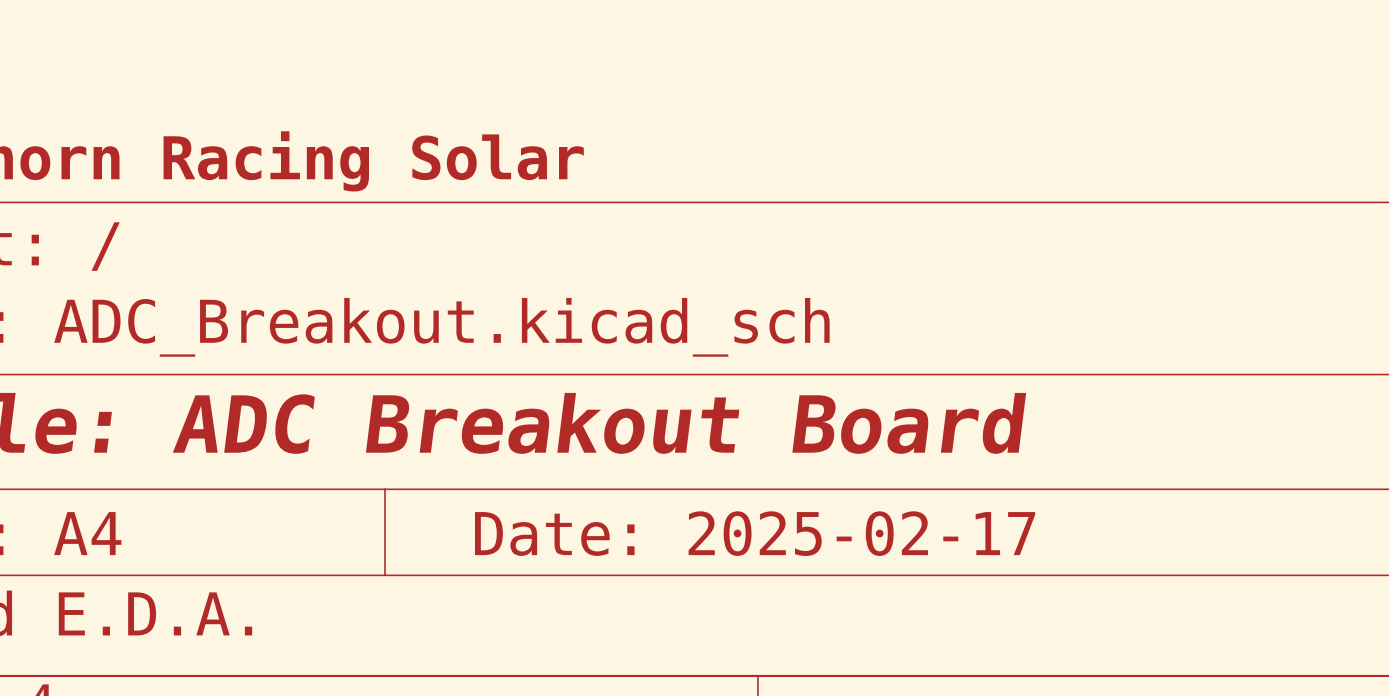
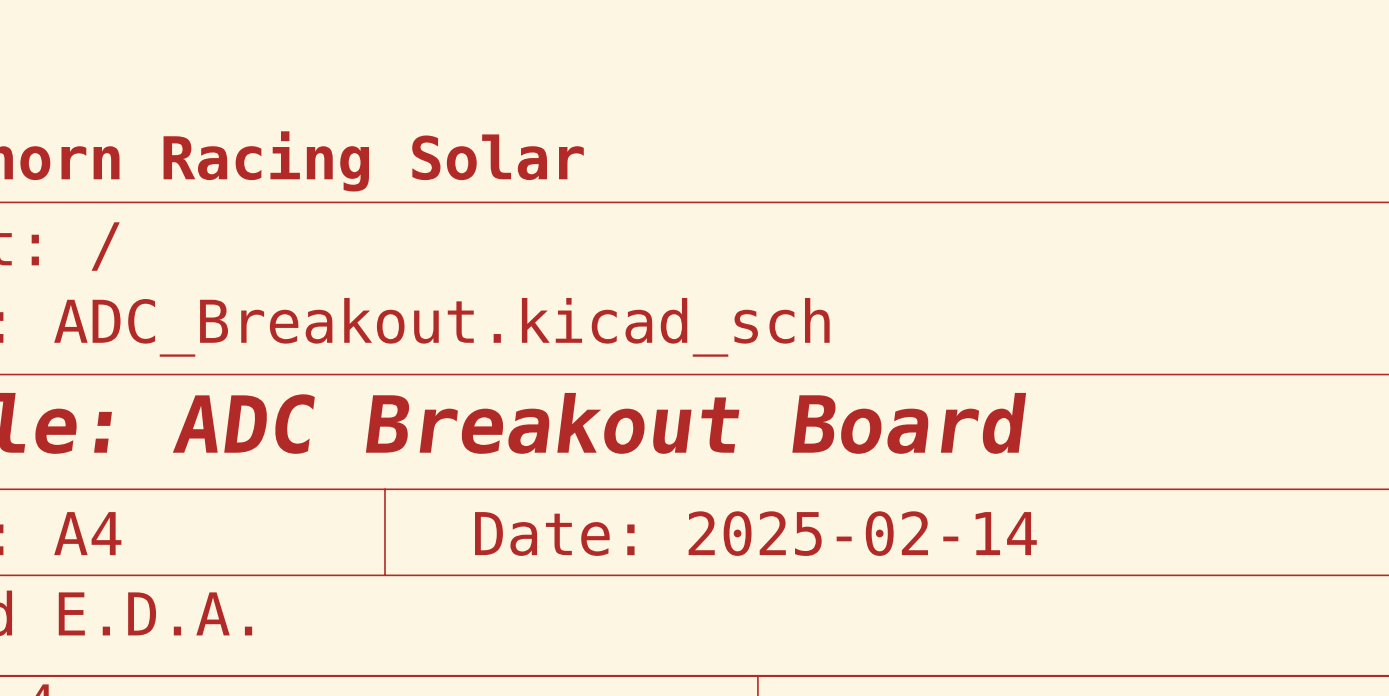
title block: Date: 2025-02-17 (755, 533) -> Date: 2025-02-14 (755, 533)

